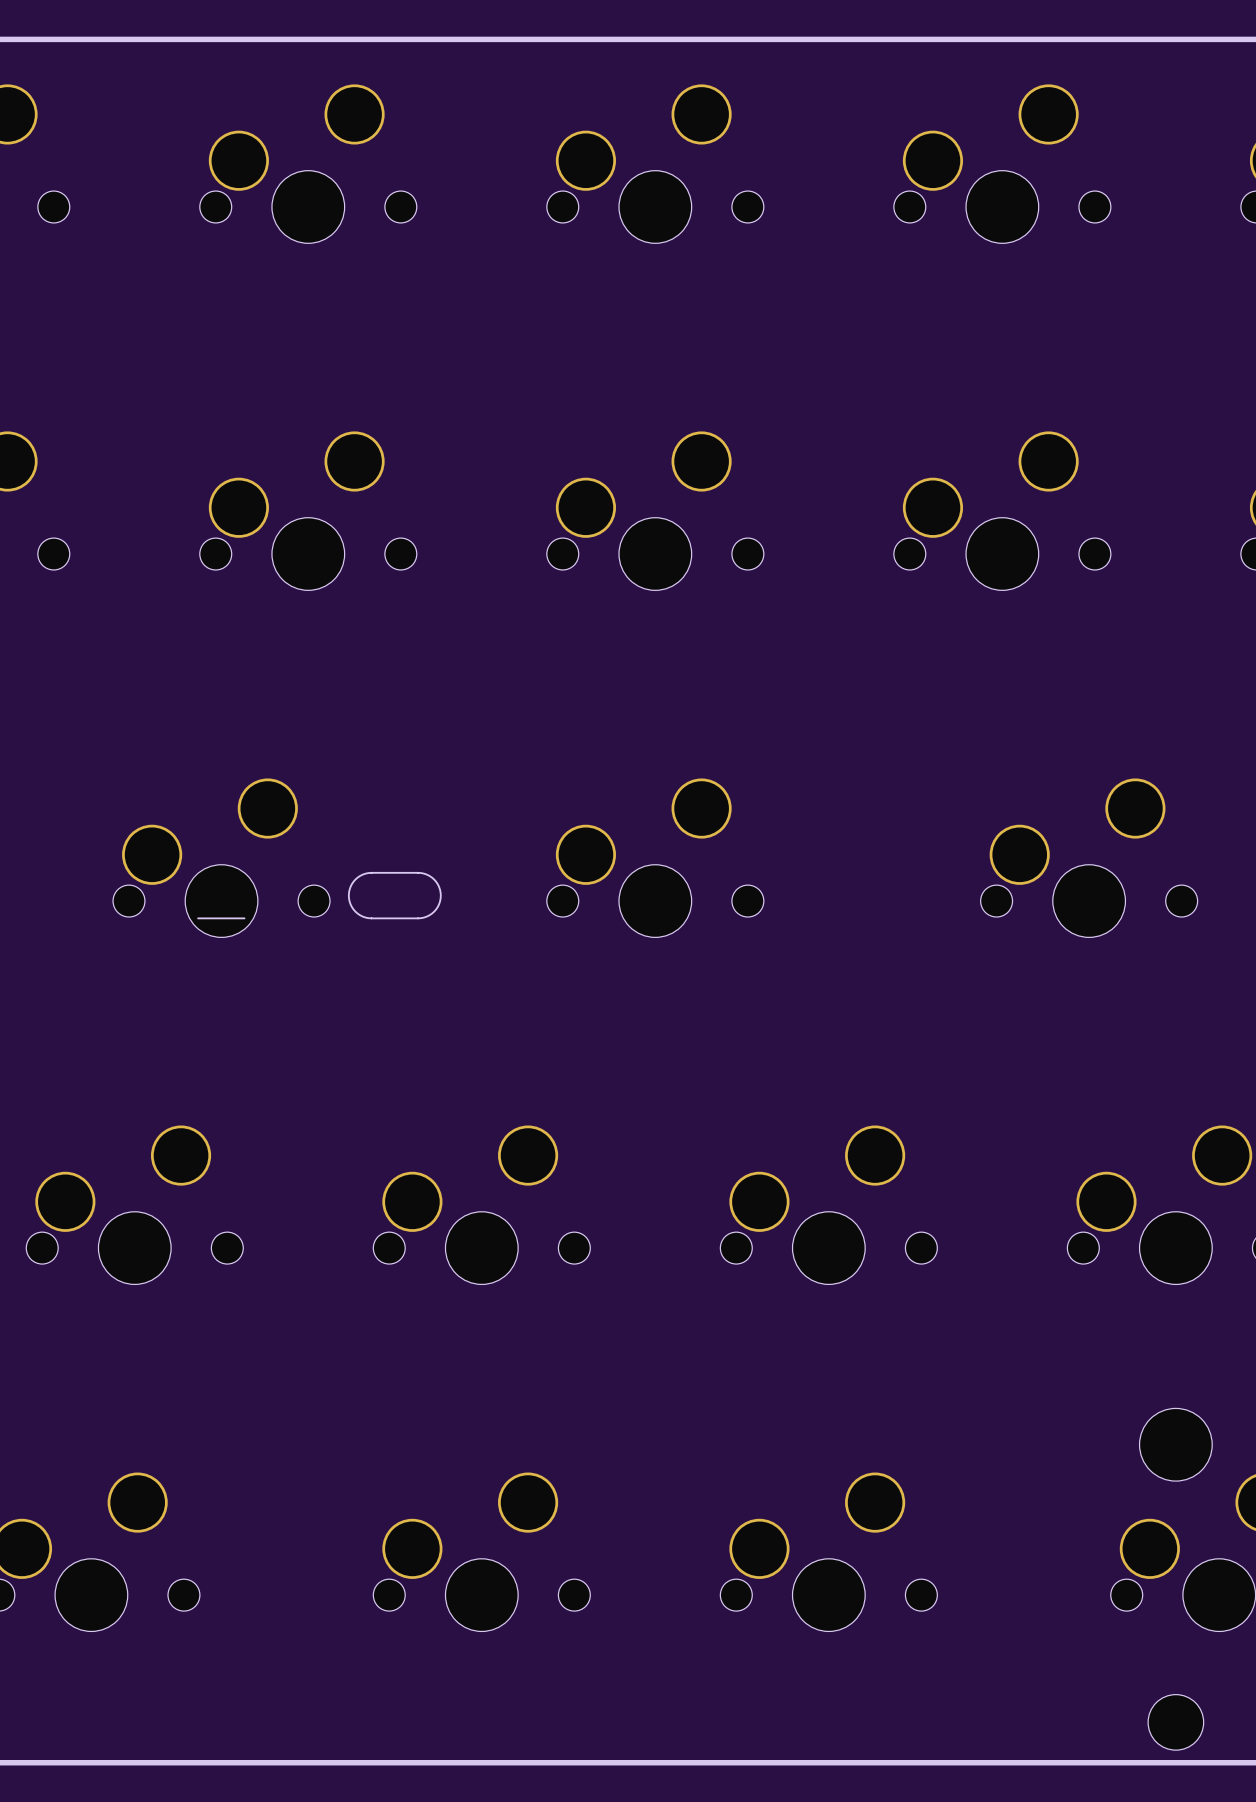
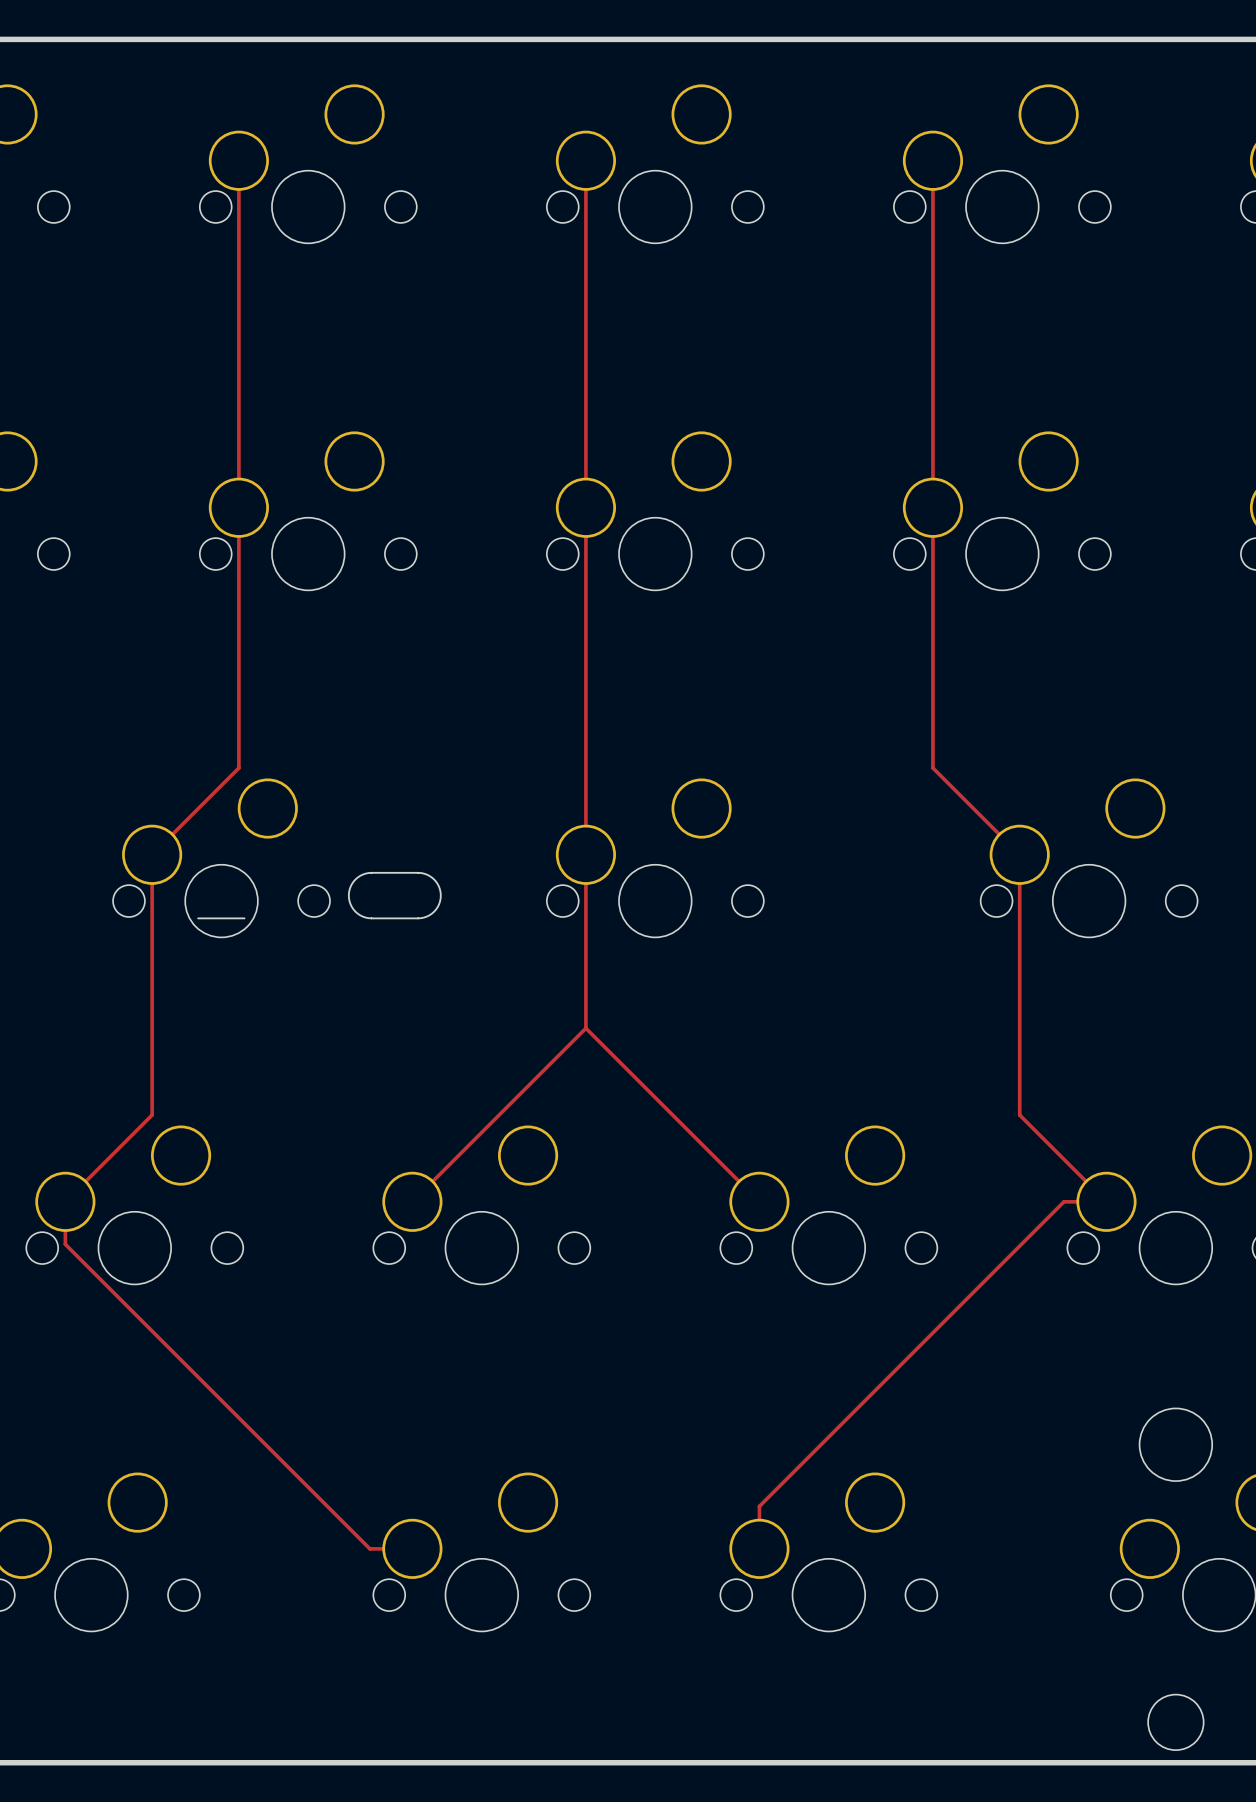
track: none -> (238, 160) (238, 768) (152, 854) (152, 1115) (65, 1201) (65, 1244) (369, 1548) (412, 1548)
track: none -> (585, 160) (585, 1028)
track: none -> (932, 160) (932, 768) (1019, 854) (1019, 1115) (1106, 1201) (1063, 1201) (759, 1506) (759, 1548)
track: none -> (585, 1028) (412, 1201)
track: none -> (585, 1028) (759, 1201)

